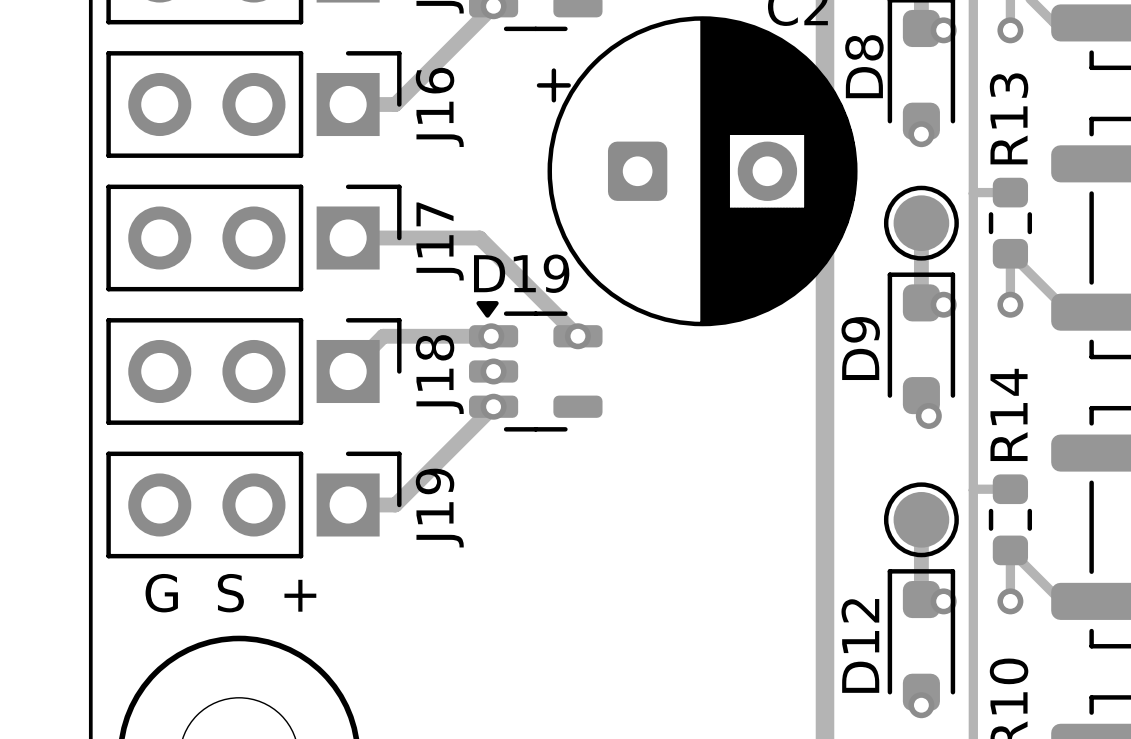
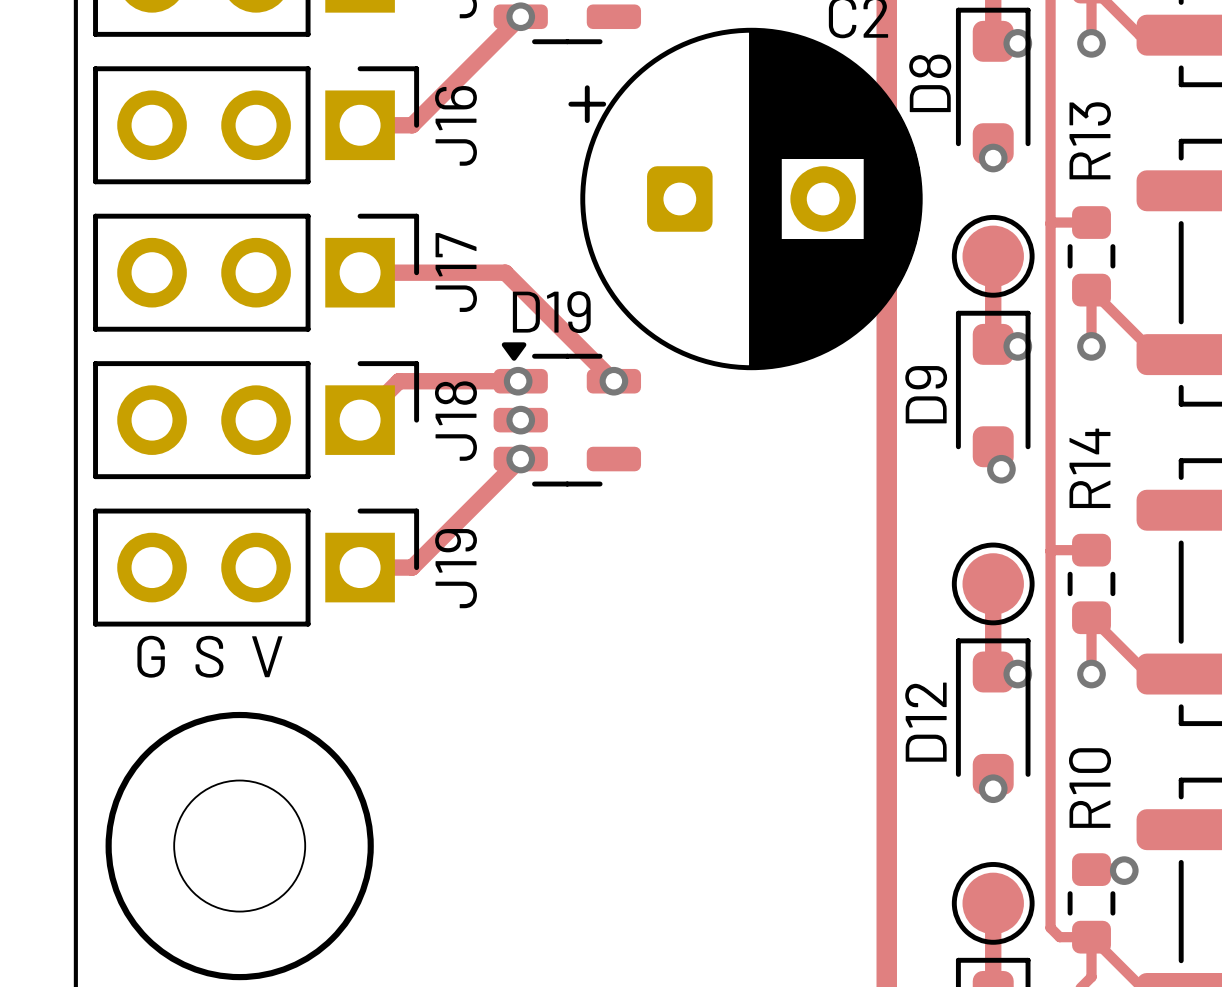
text: G S + (230, 593) -> G S V (209, 656)

